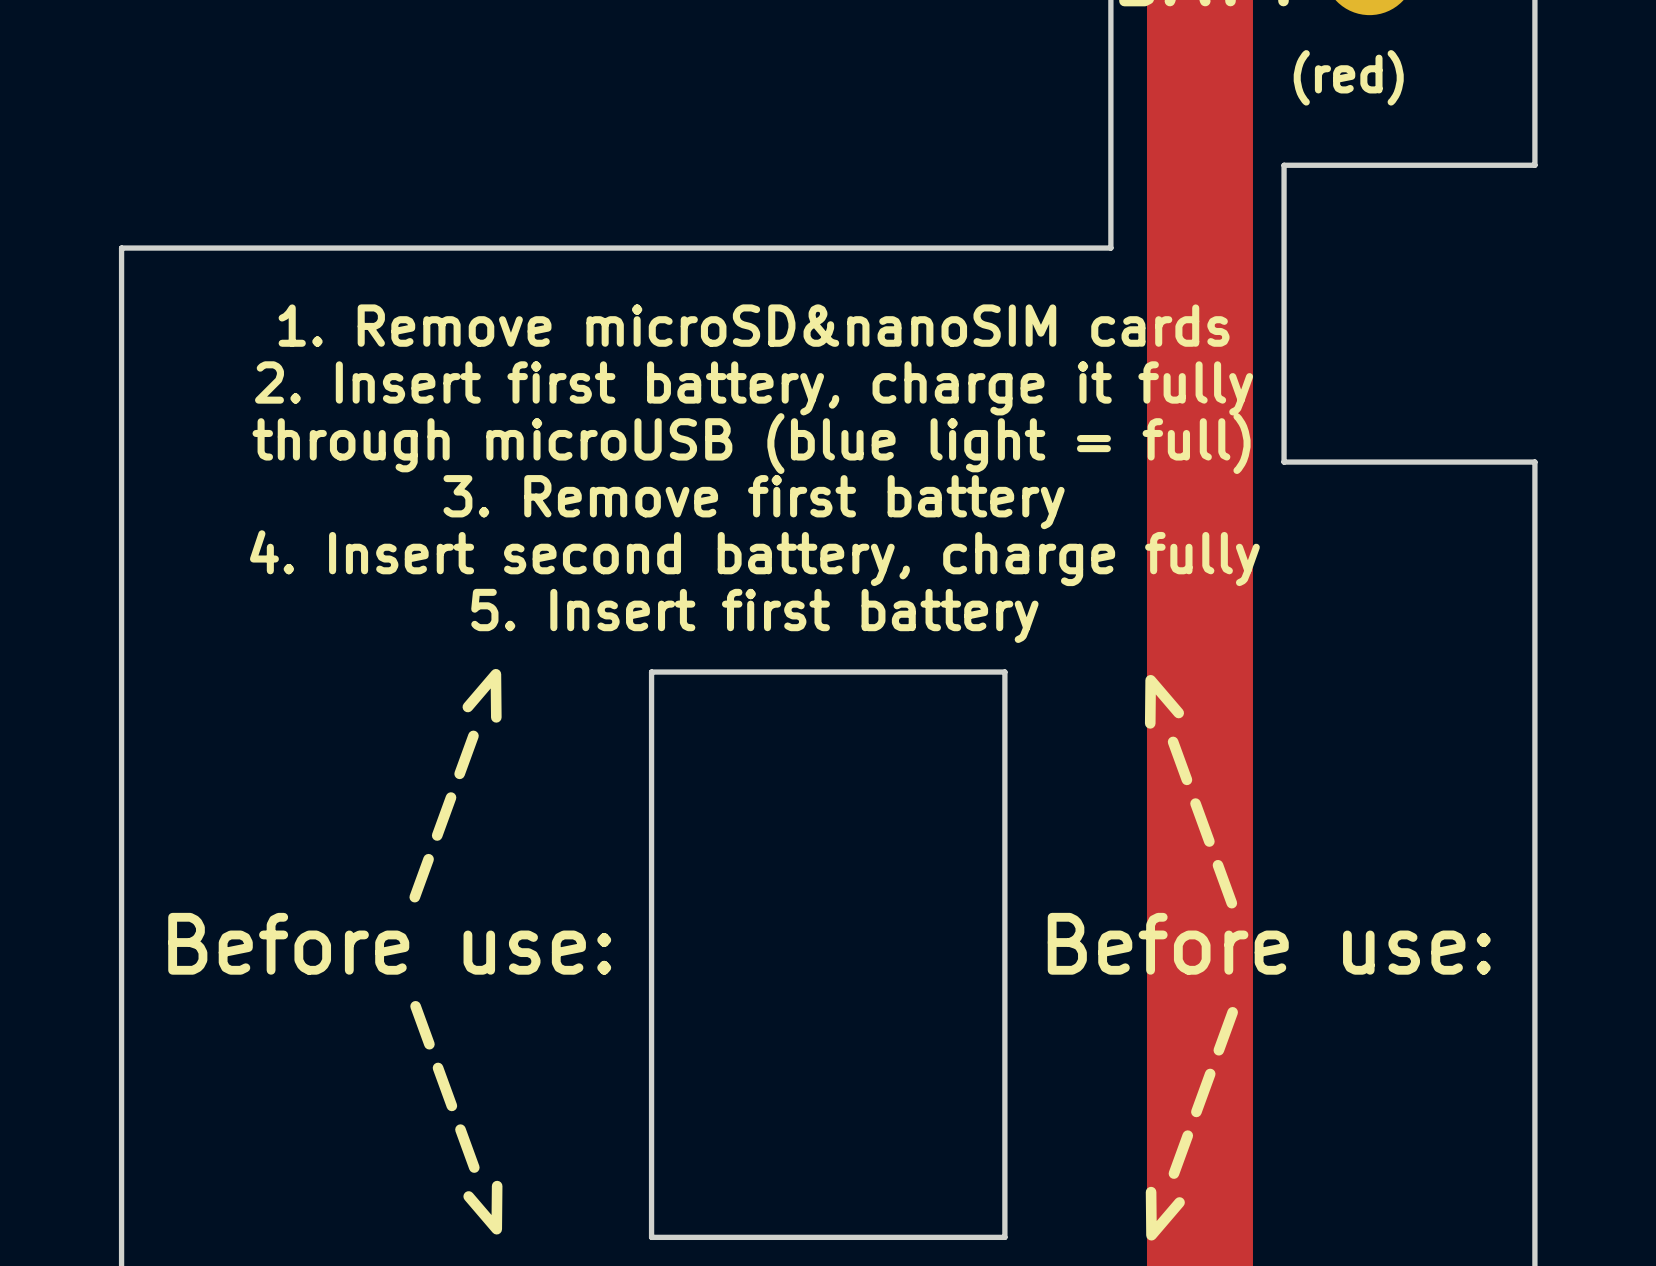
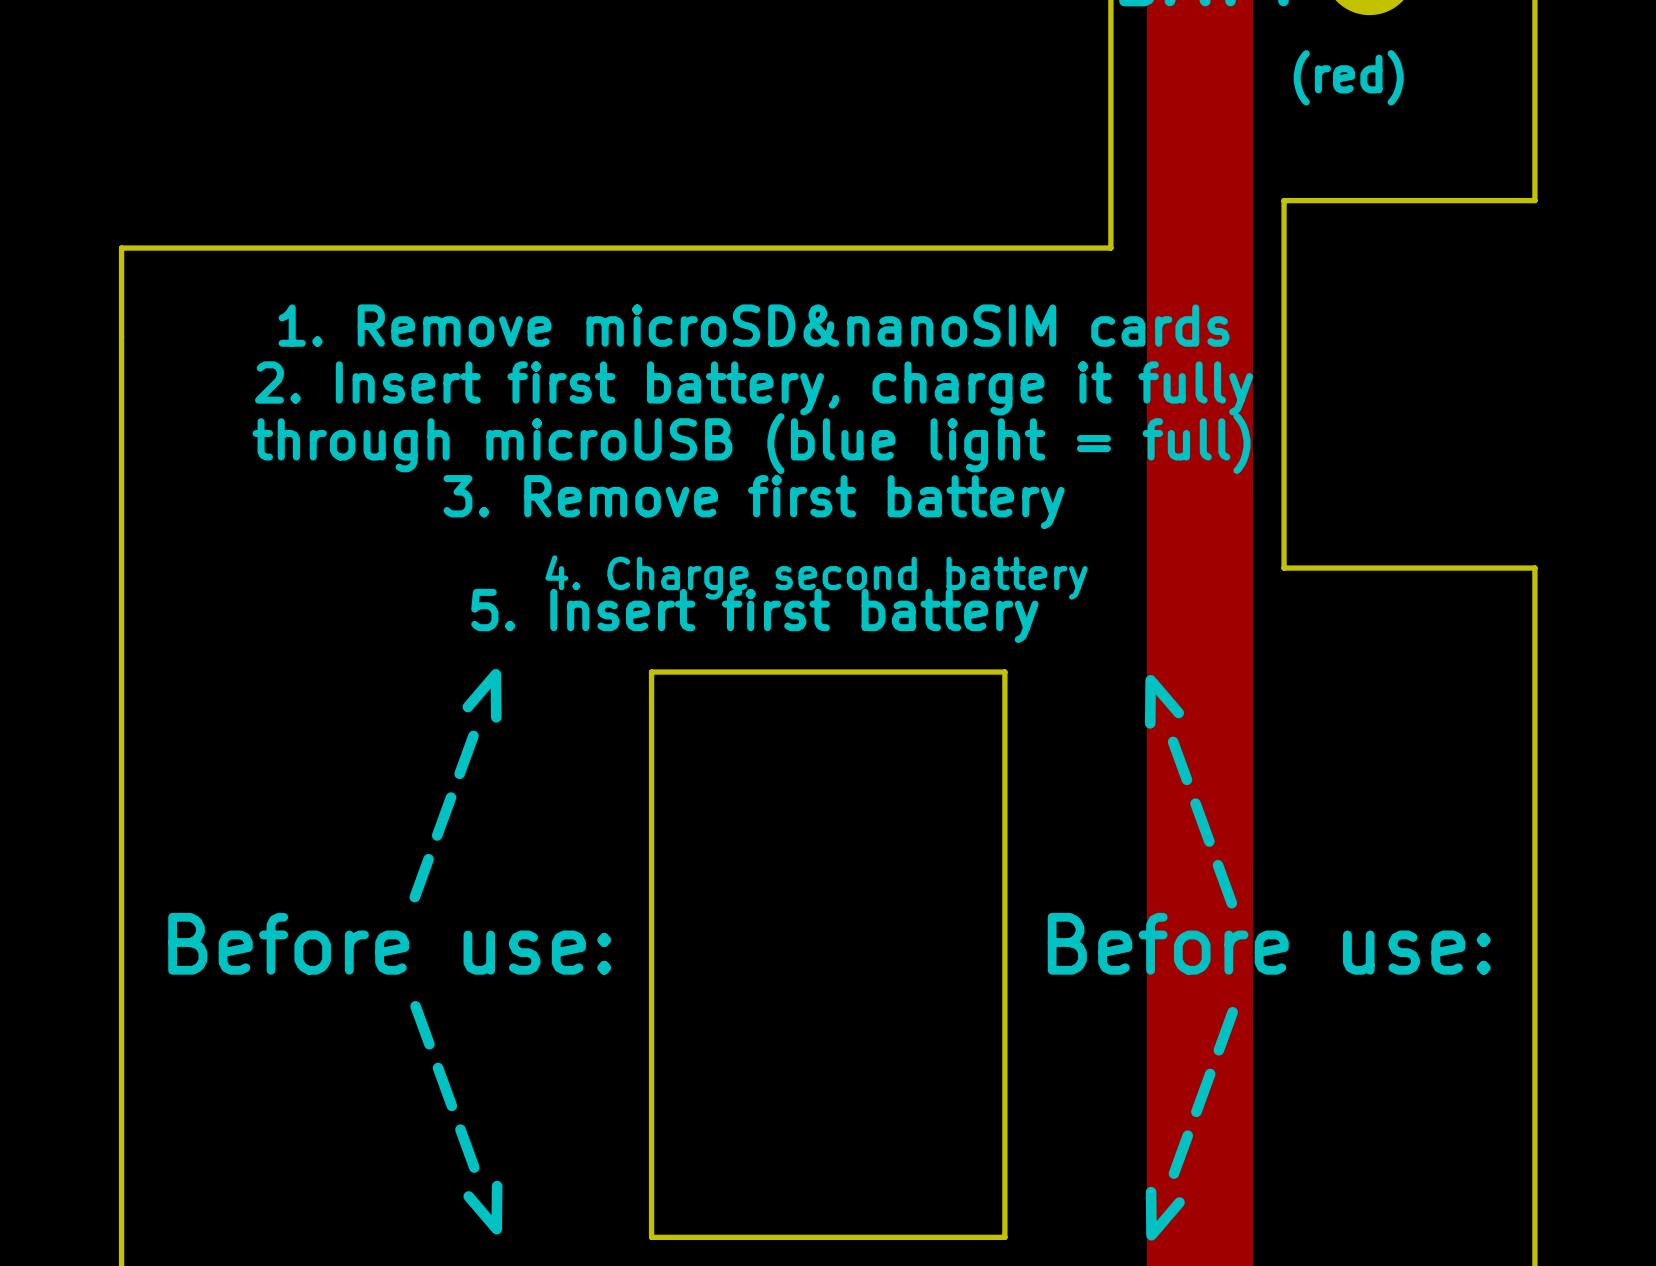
board edge: (1534, 165) (1284, 165) (1284, 200) -> (1534, 165) (1534, 200) (1284, 200)
board edge: (1284, 462) (1534, 462) (1534, 568) -> (1284, 462) (1284, 568) (1534, 568)
text: 4. Insert second battery, charge fully (754, 558) -> 4. Charge second battery (816, 577)

